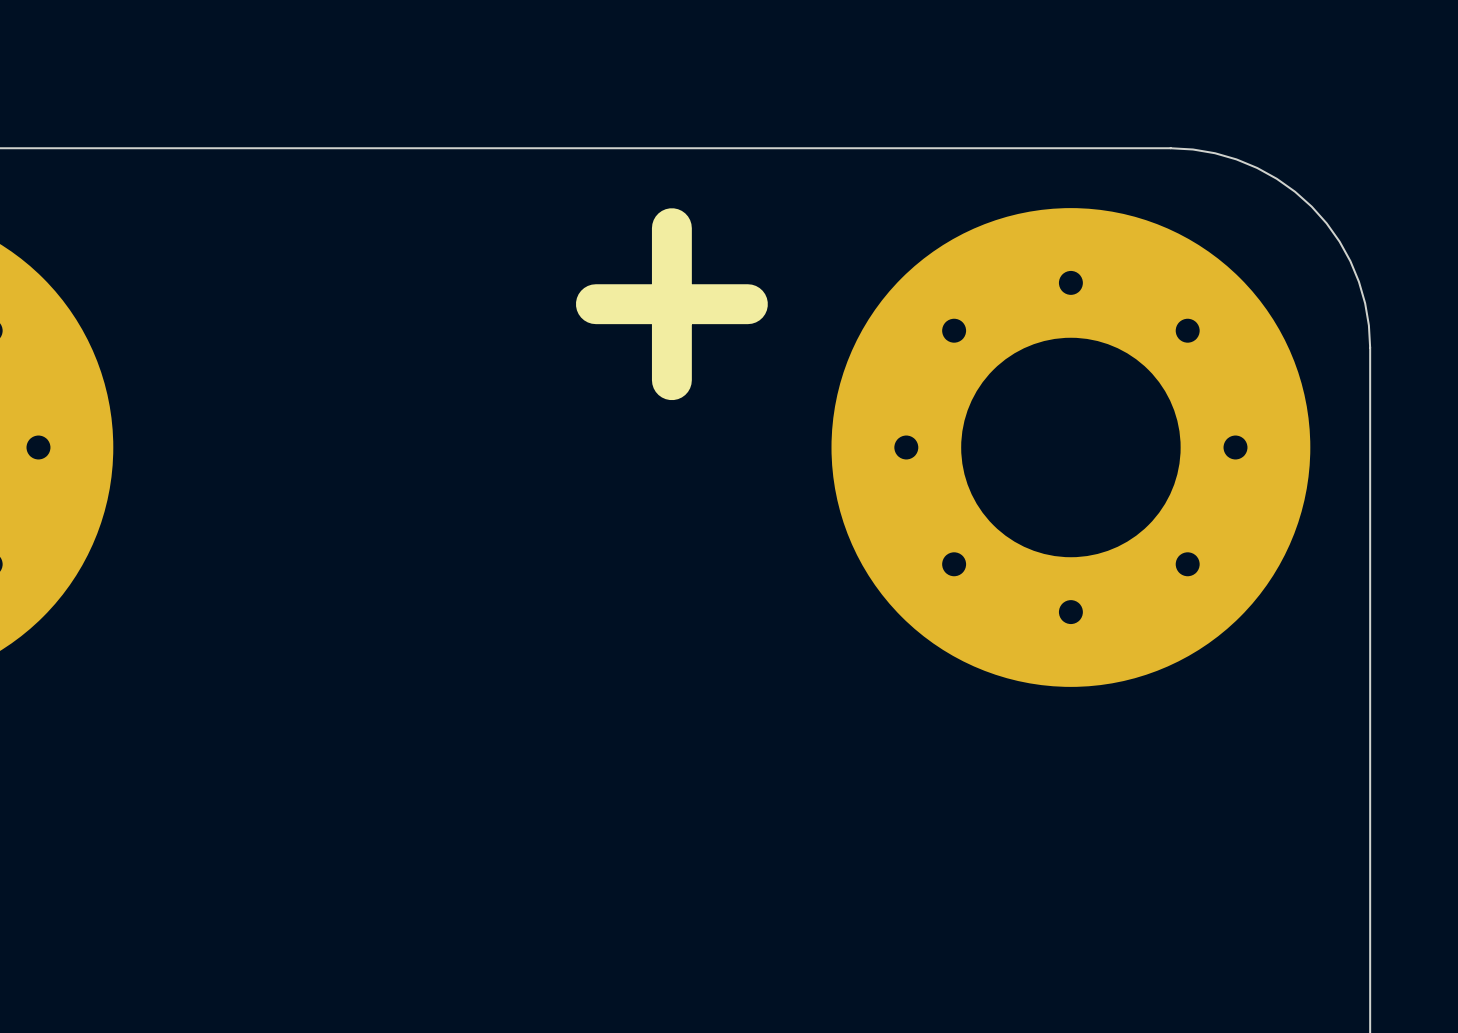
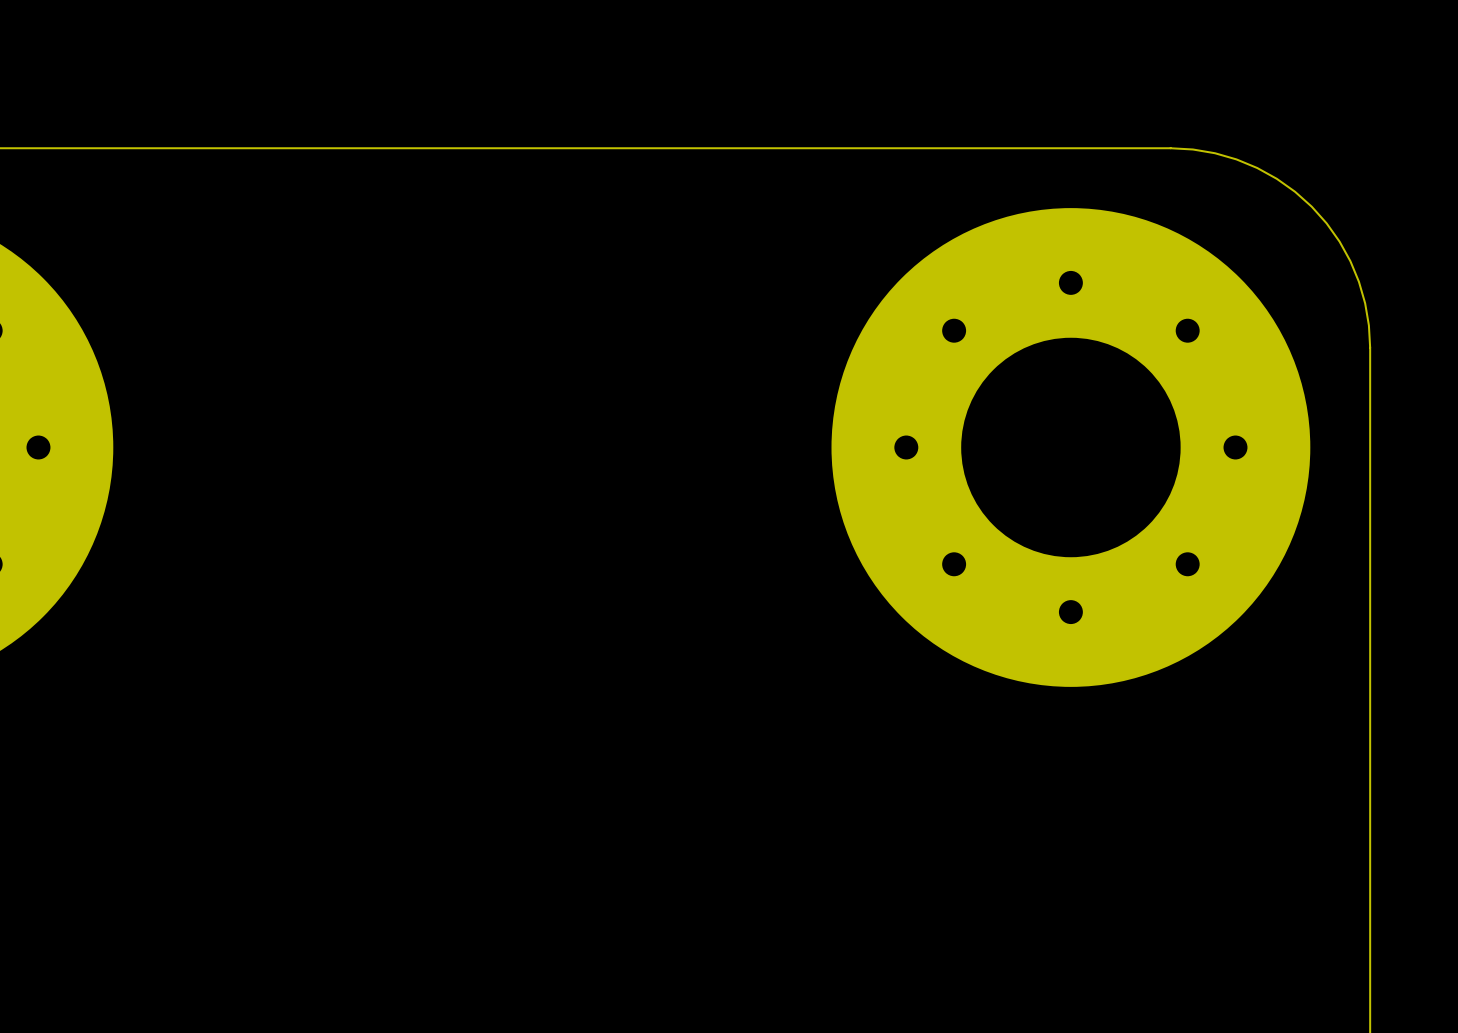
text: + (671, 304) -> none

